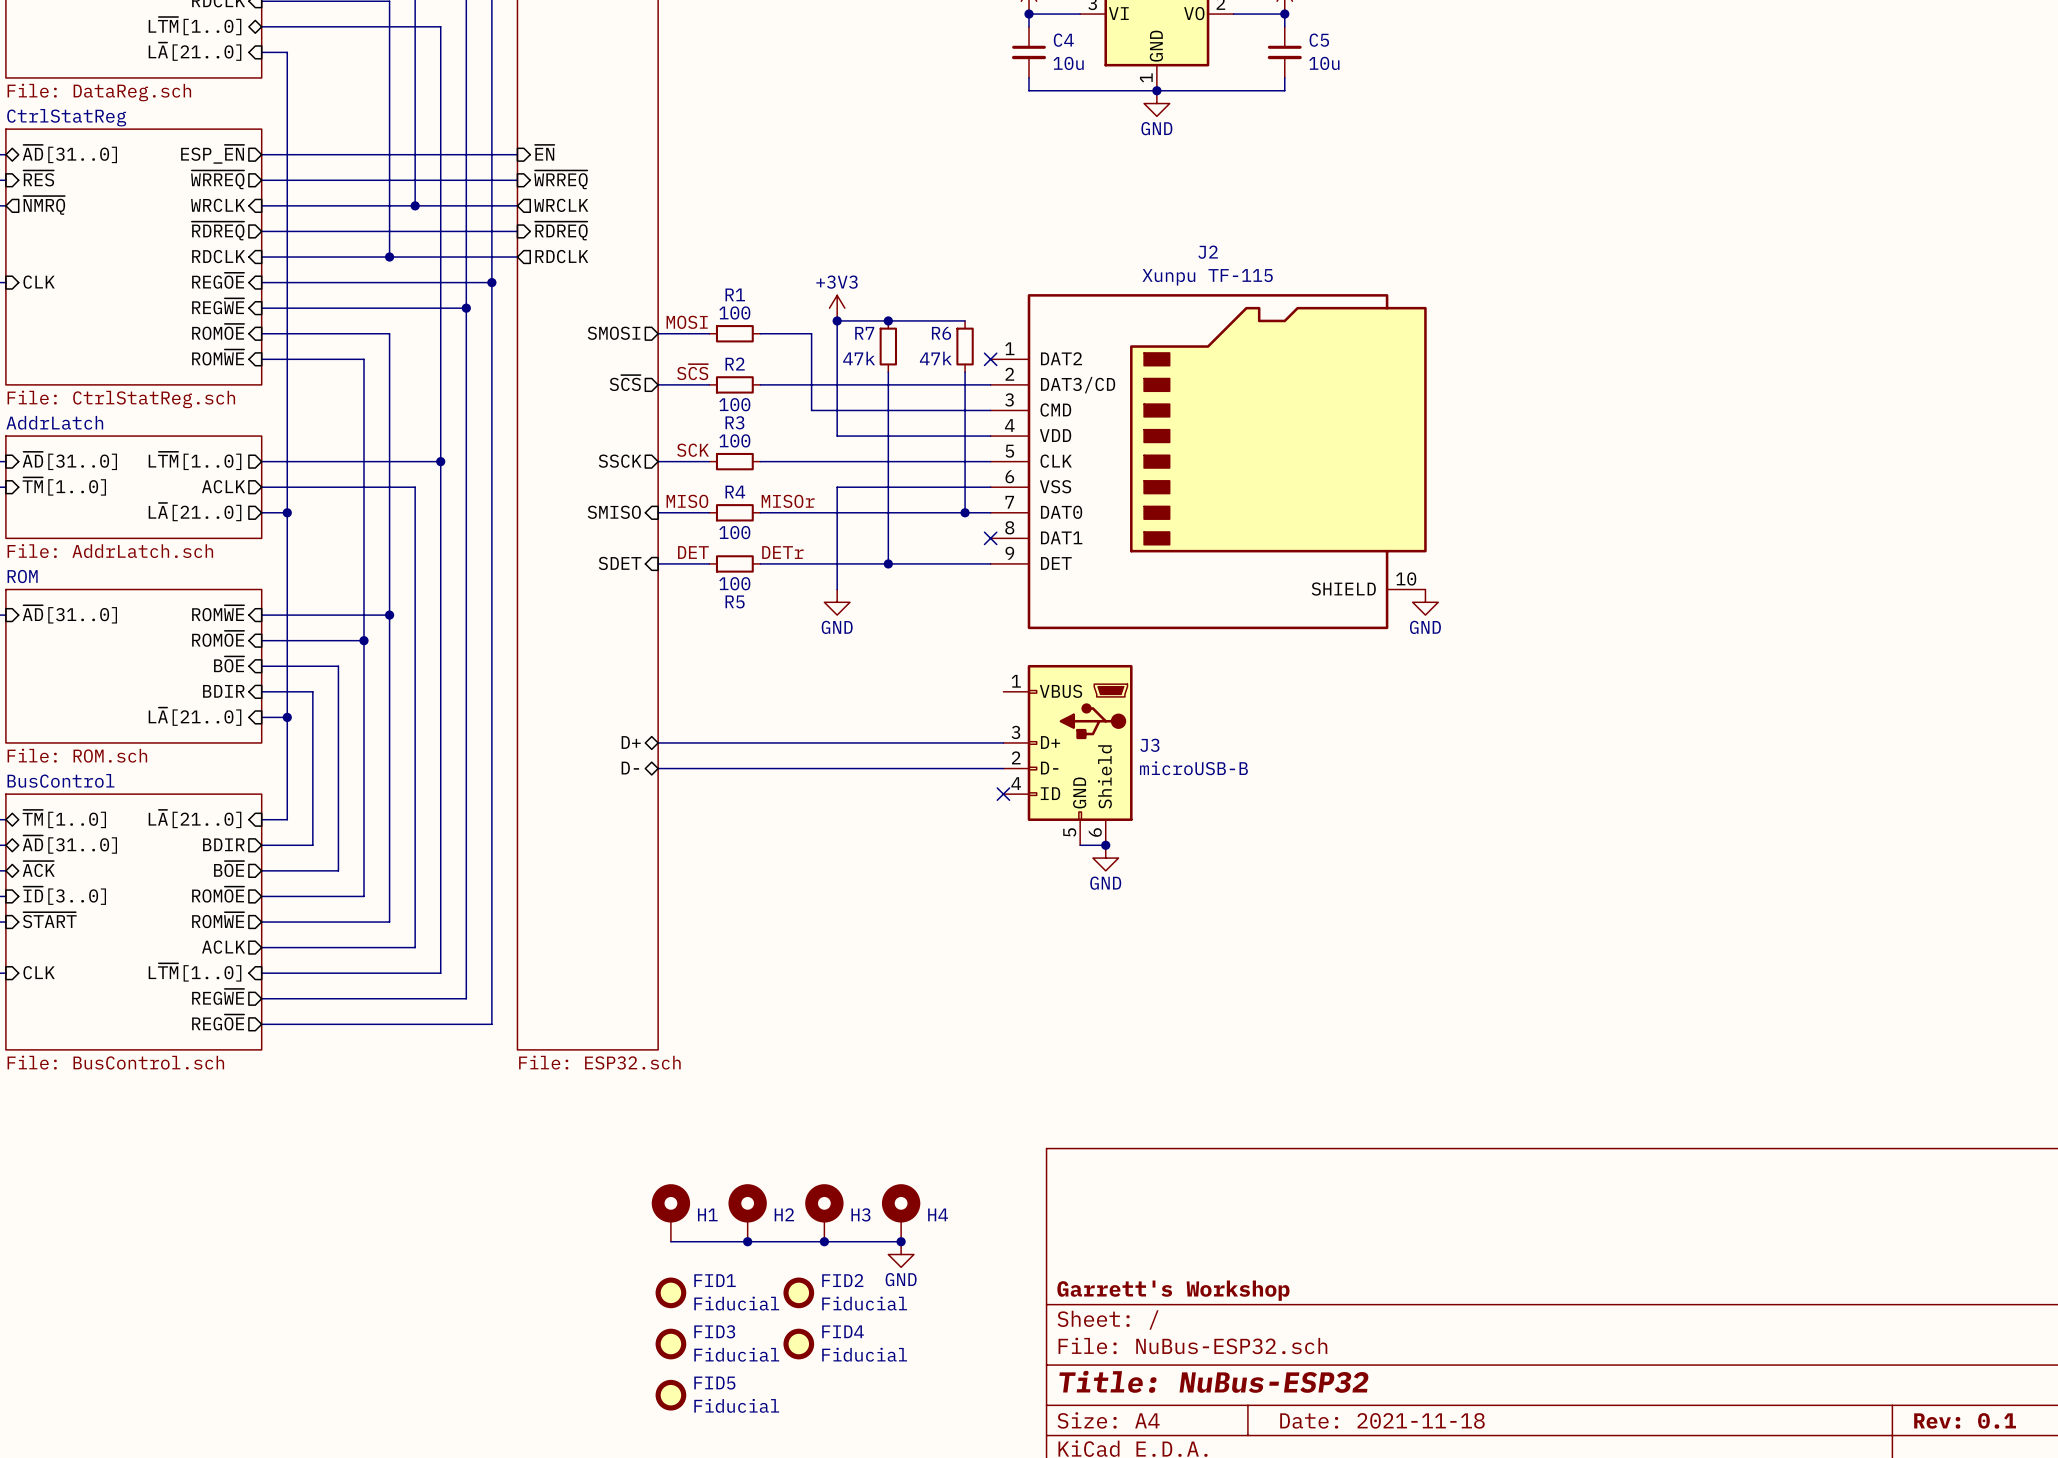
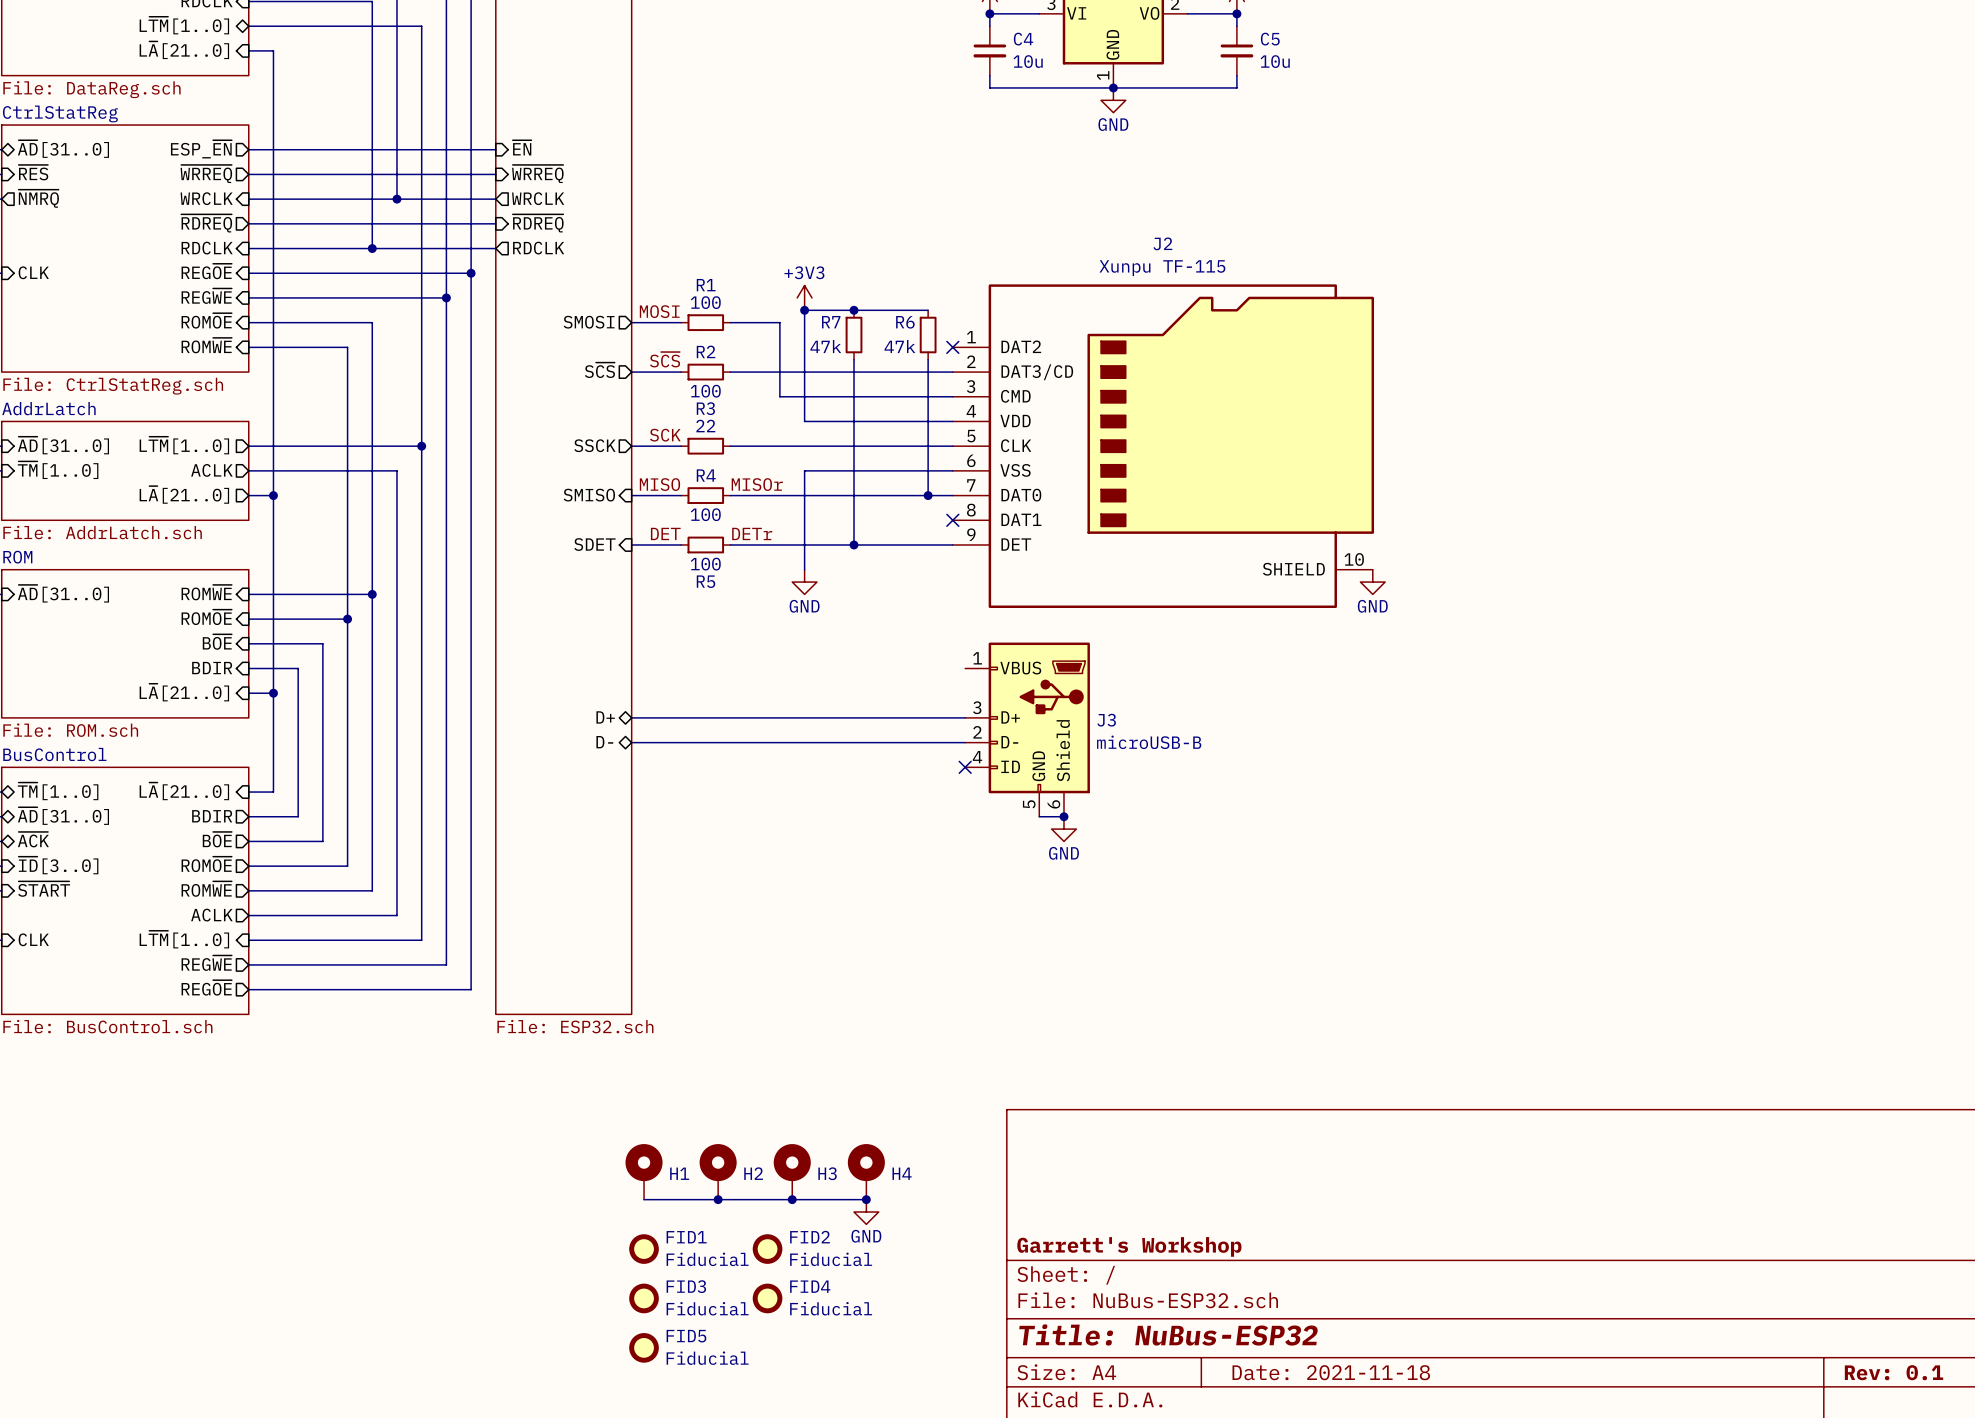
R3 value: 100 (734, 440) -> 22 (705, 426)

